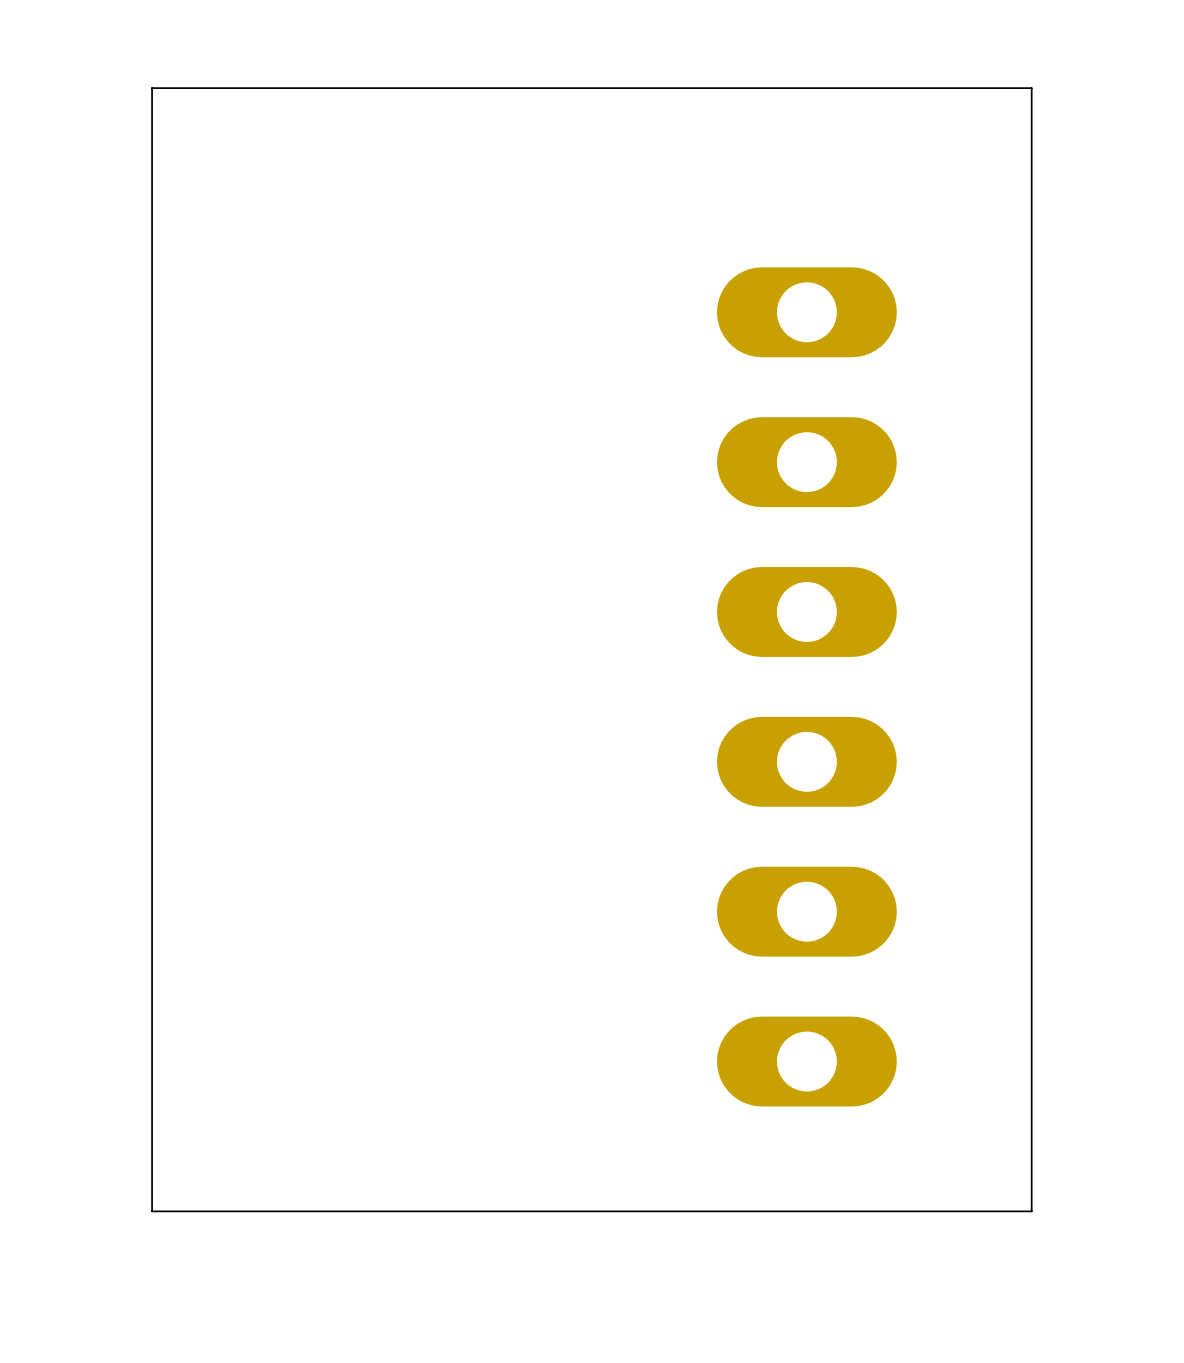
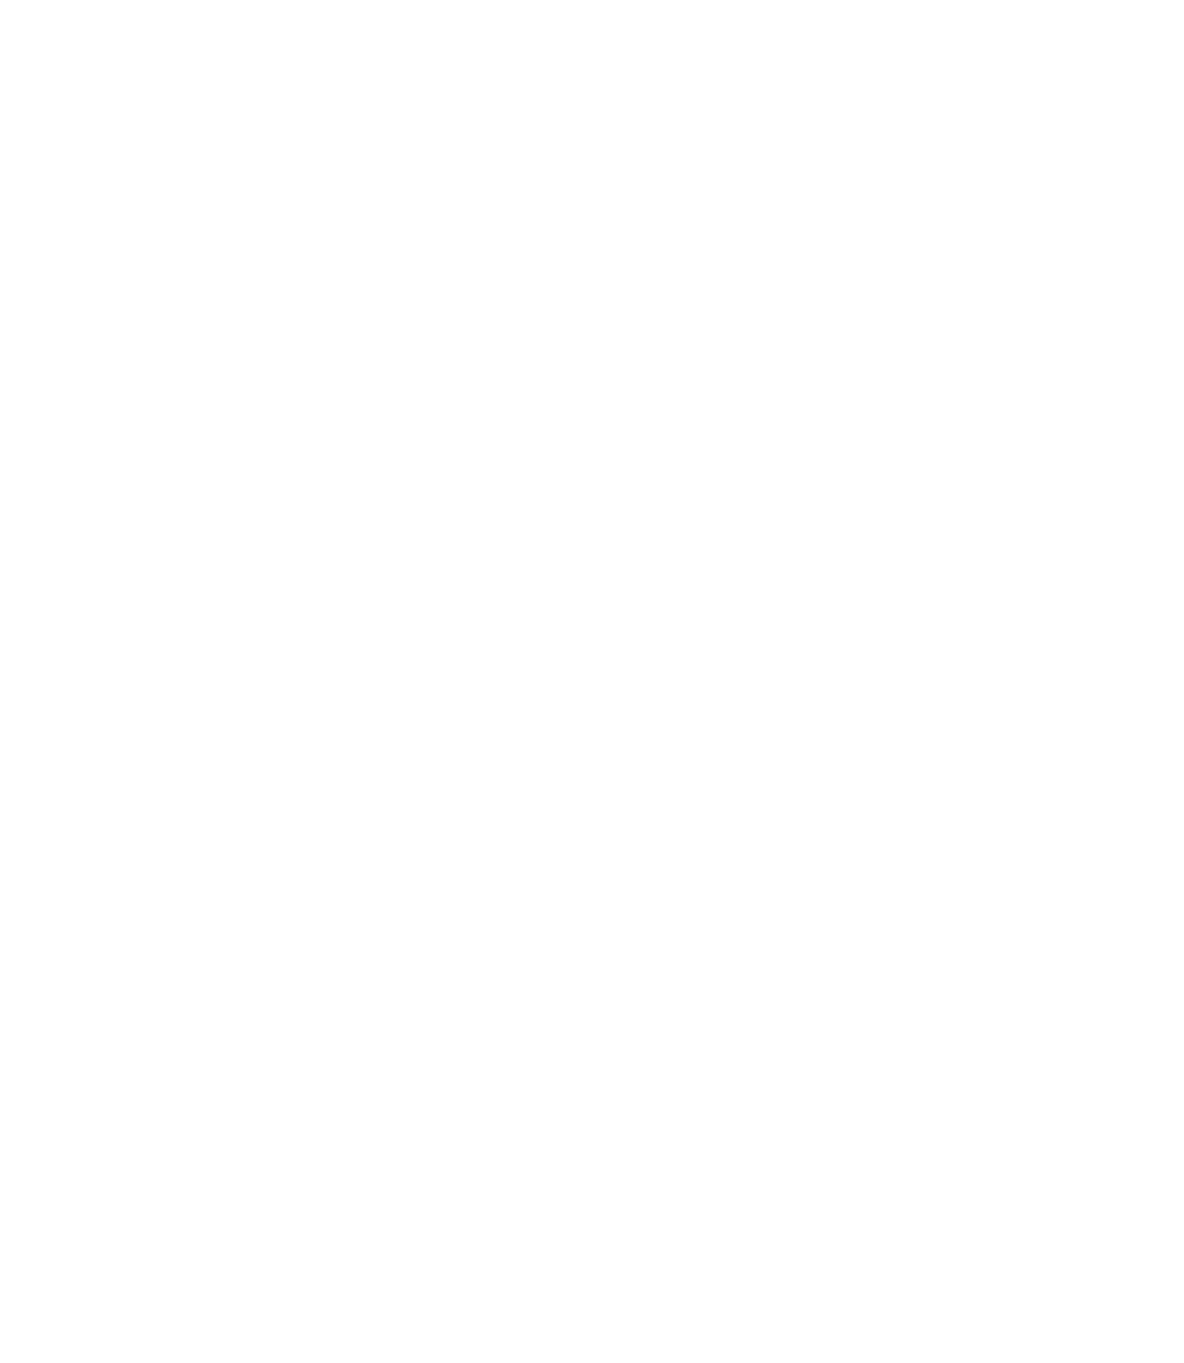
board edge: (1031, 88) (152, 88) (152, 1211) (1031, 1211) (1031, 88) -> none
part: (806, 686) -> none

